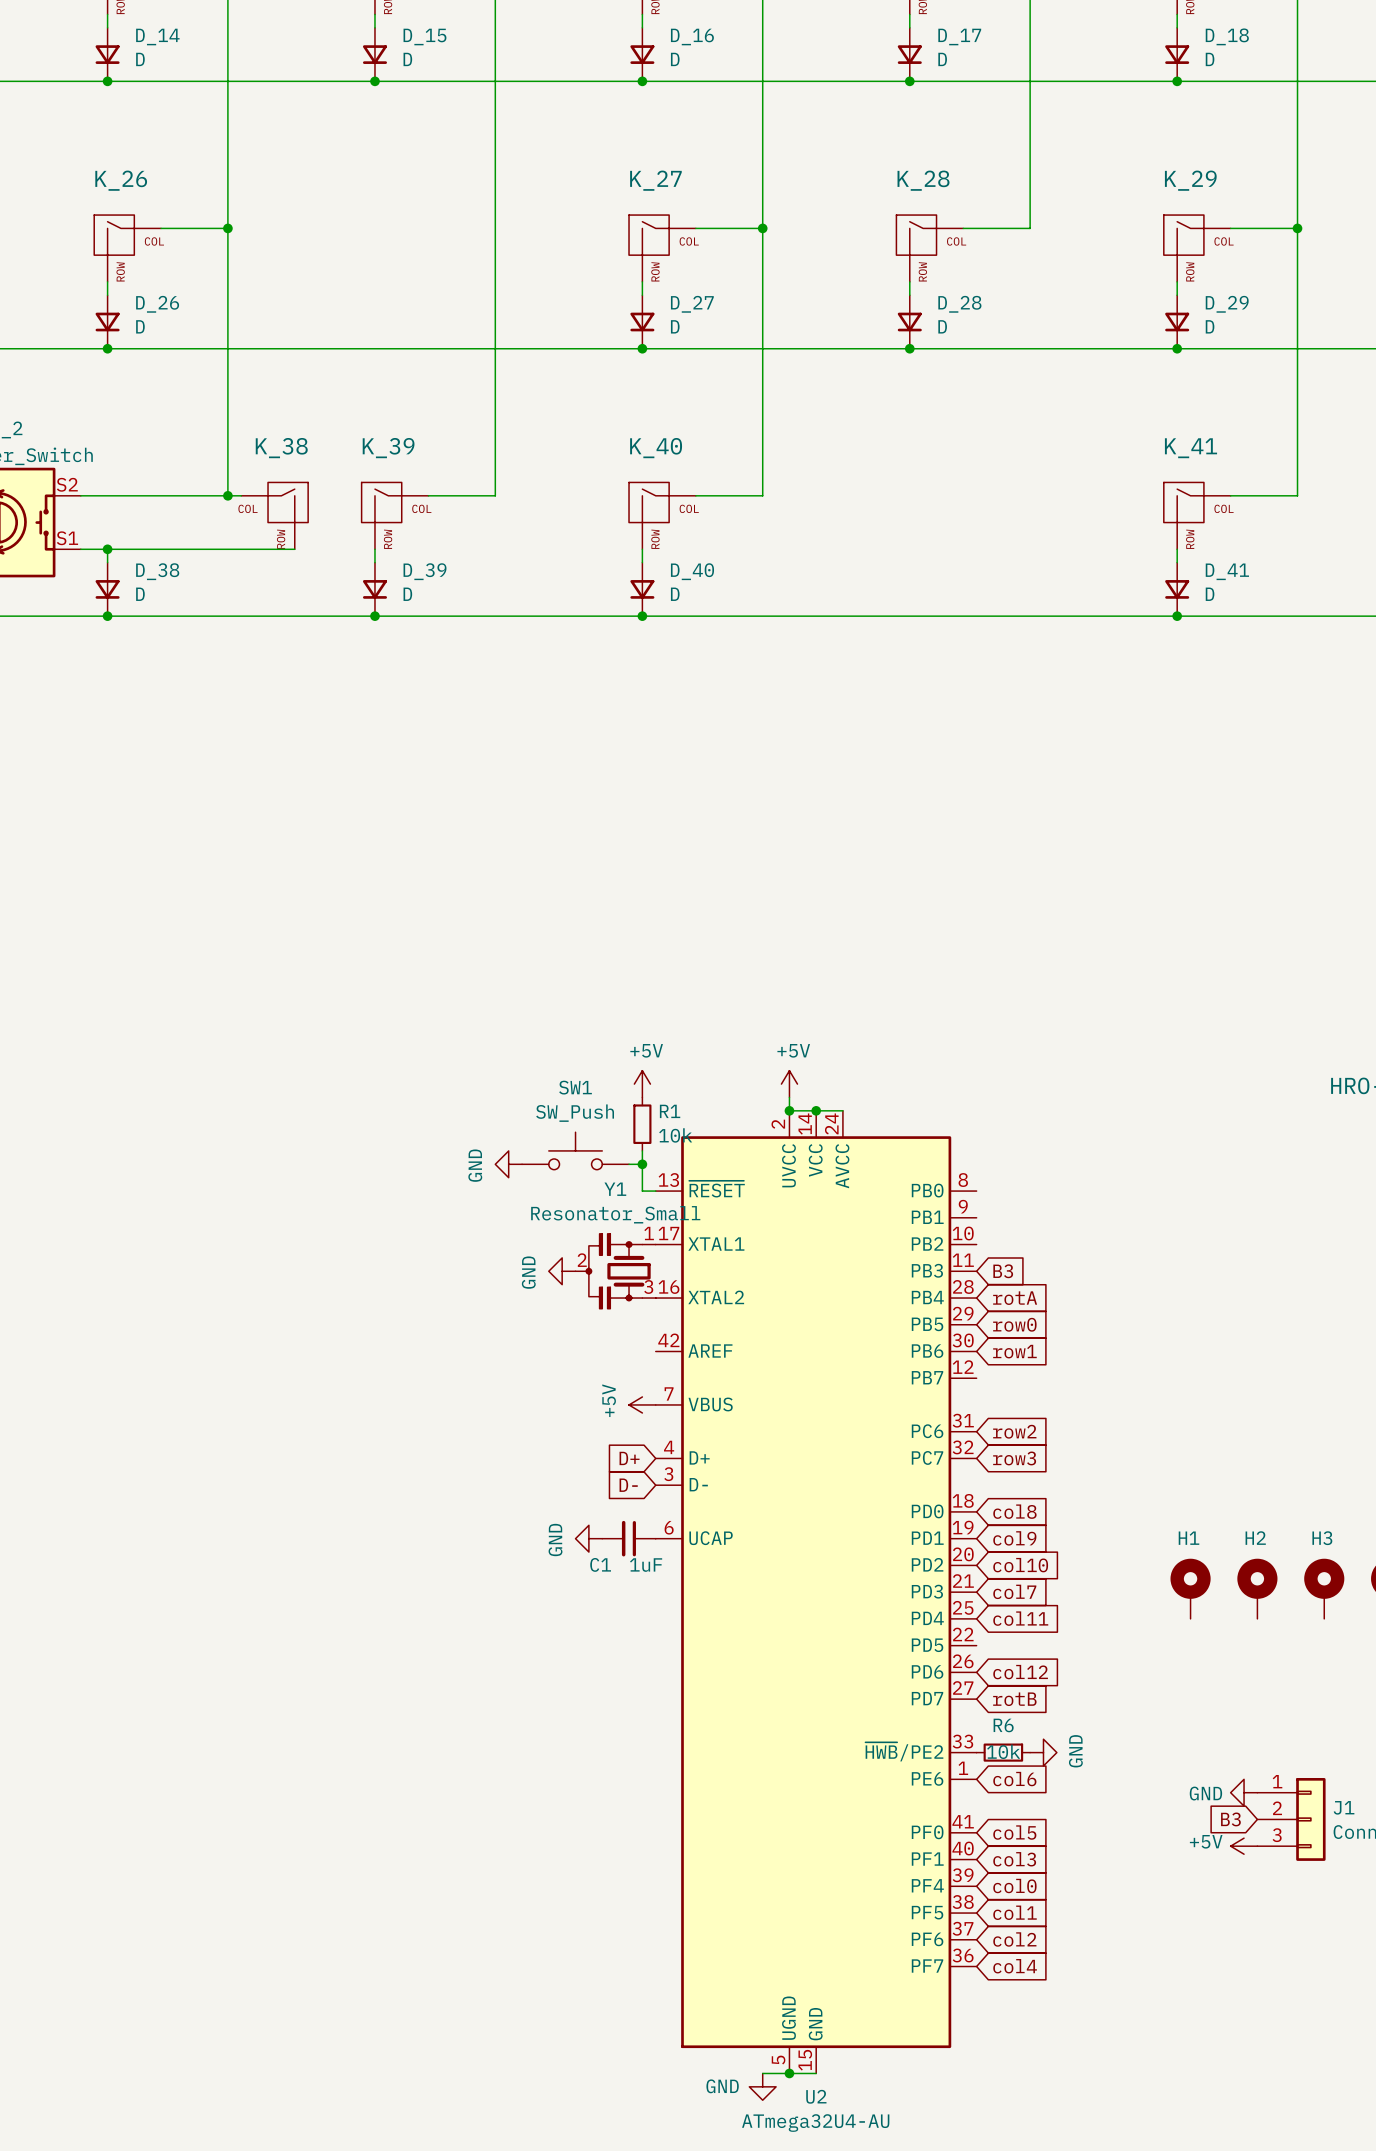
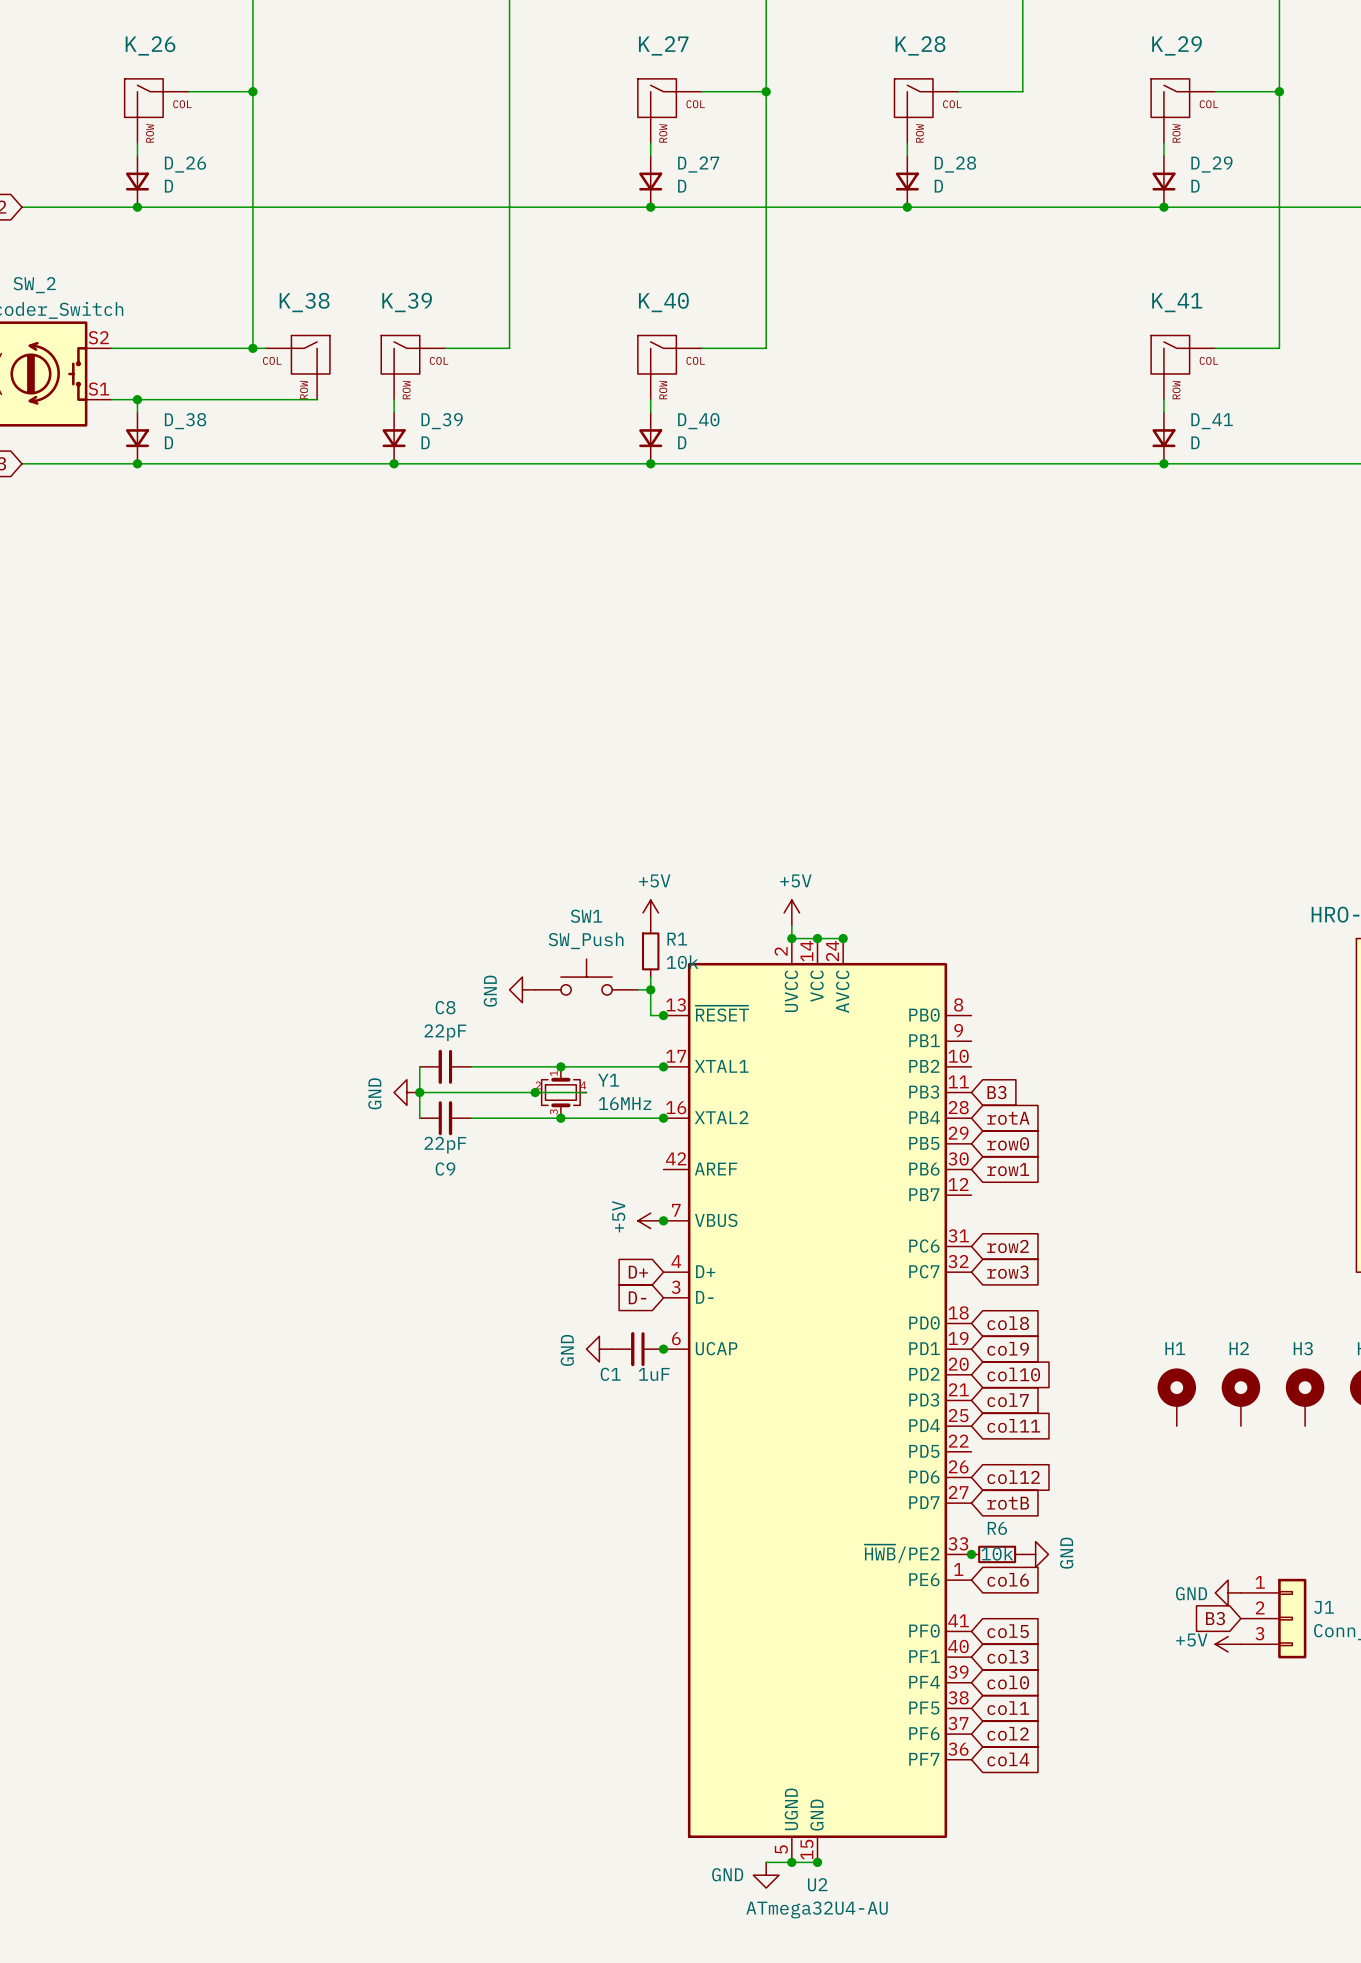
junction: none -> (843, 938)
Y1 name position: Y1 (615, 1189) -> Y1 (608, 1080)
junction: none -> (663, 1015)
Y1 value: Resonator_Small (615, 1214) -> 16MHz (625, 1103)
Y1 symbol: [575, 1233, 656, 1309] -> [535, 1066, 587, 1119]
wire: none -> (419, 1066) (419, 1118)
C8: none -> 22pF (445, 1066)
wire: none -> (471, 1066) (663, 1066)
junction: none -> (560, 1066)
junction: none -> (663, 1066)
wire: none -> (419, 1092) (586, 1092)
junction: none -> (419, 1092)
junction: none -> (535, 1092)
power symbol position: GND (562, 1271) -> GND (406, 1092)
C9: none -> 22pF (445, 1118)
wire: none -> (471, 1118) (663, 1118)
junction: none -> (560, 1118)
junction: none -> (663, 1118)
junction: none -> (663, 1220)
junction: none -> (663, 1349)
junction: none -> (971, 1554)
junction: none -> (817, 1862)

